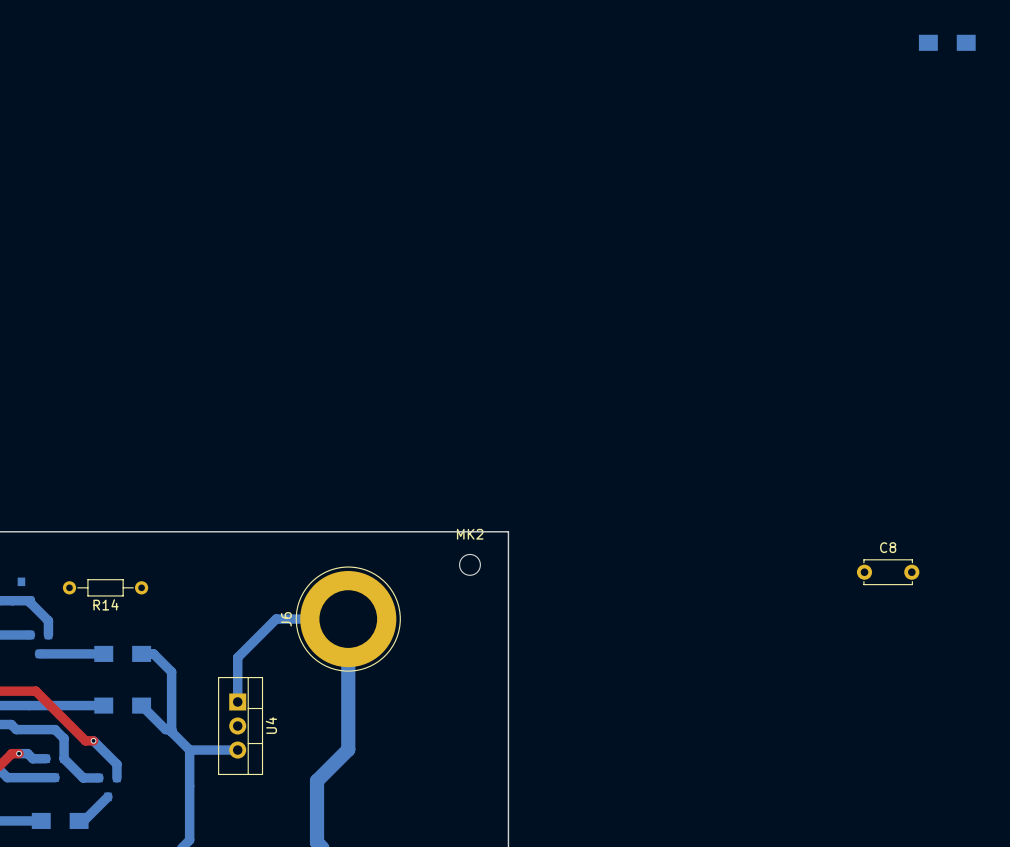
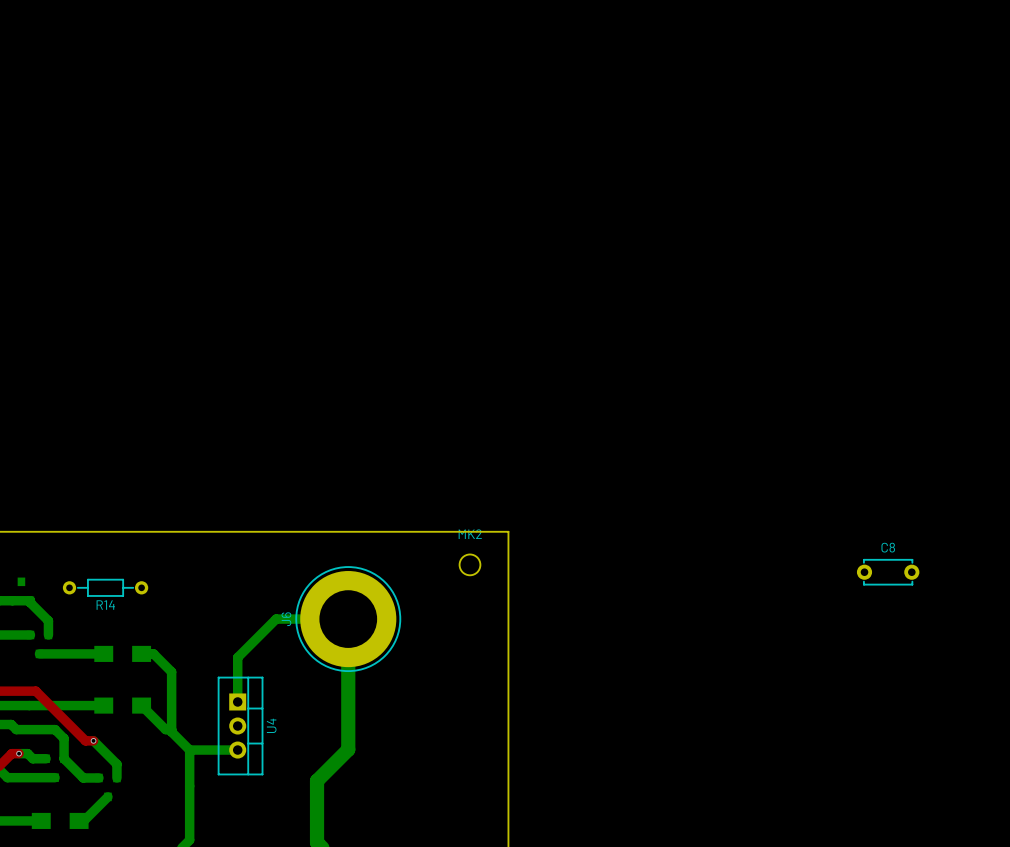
part: (947, 42) -> none

